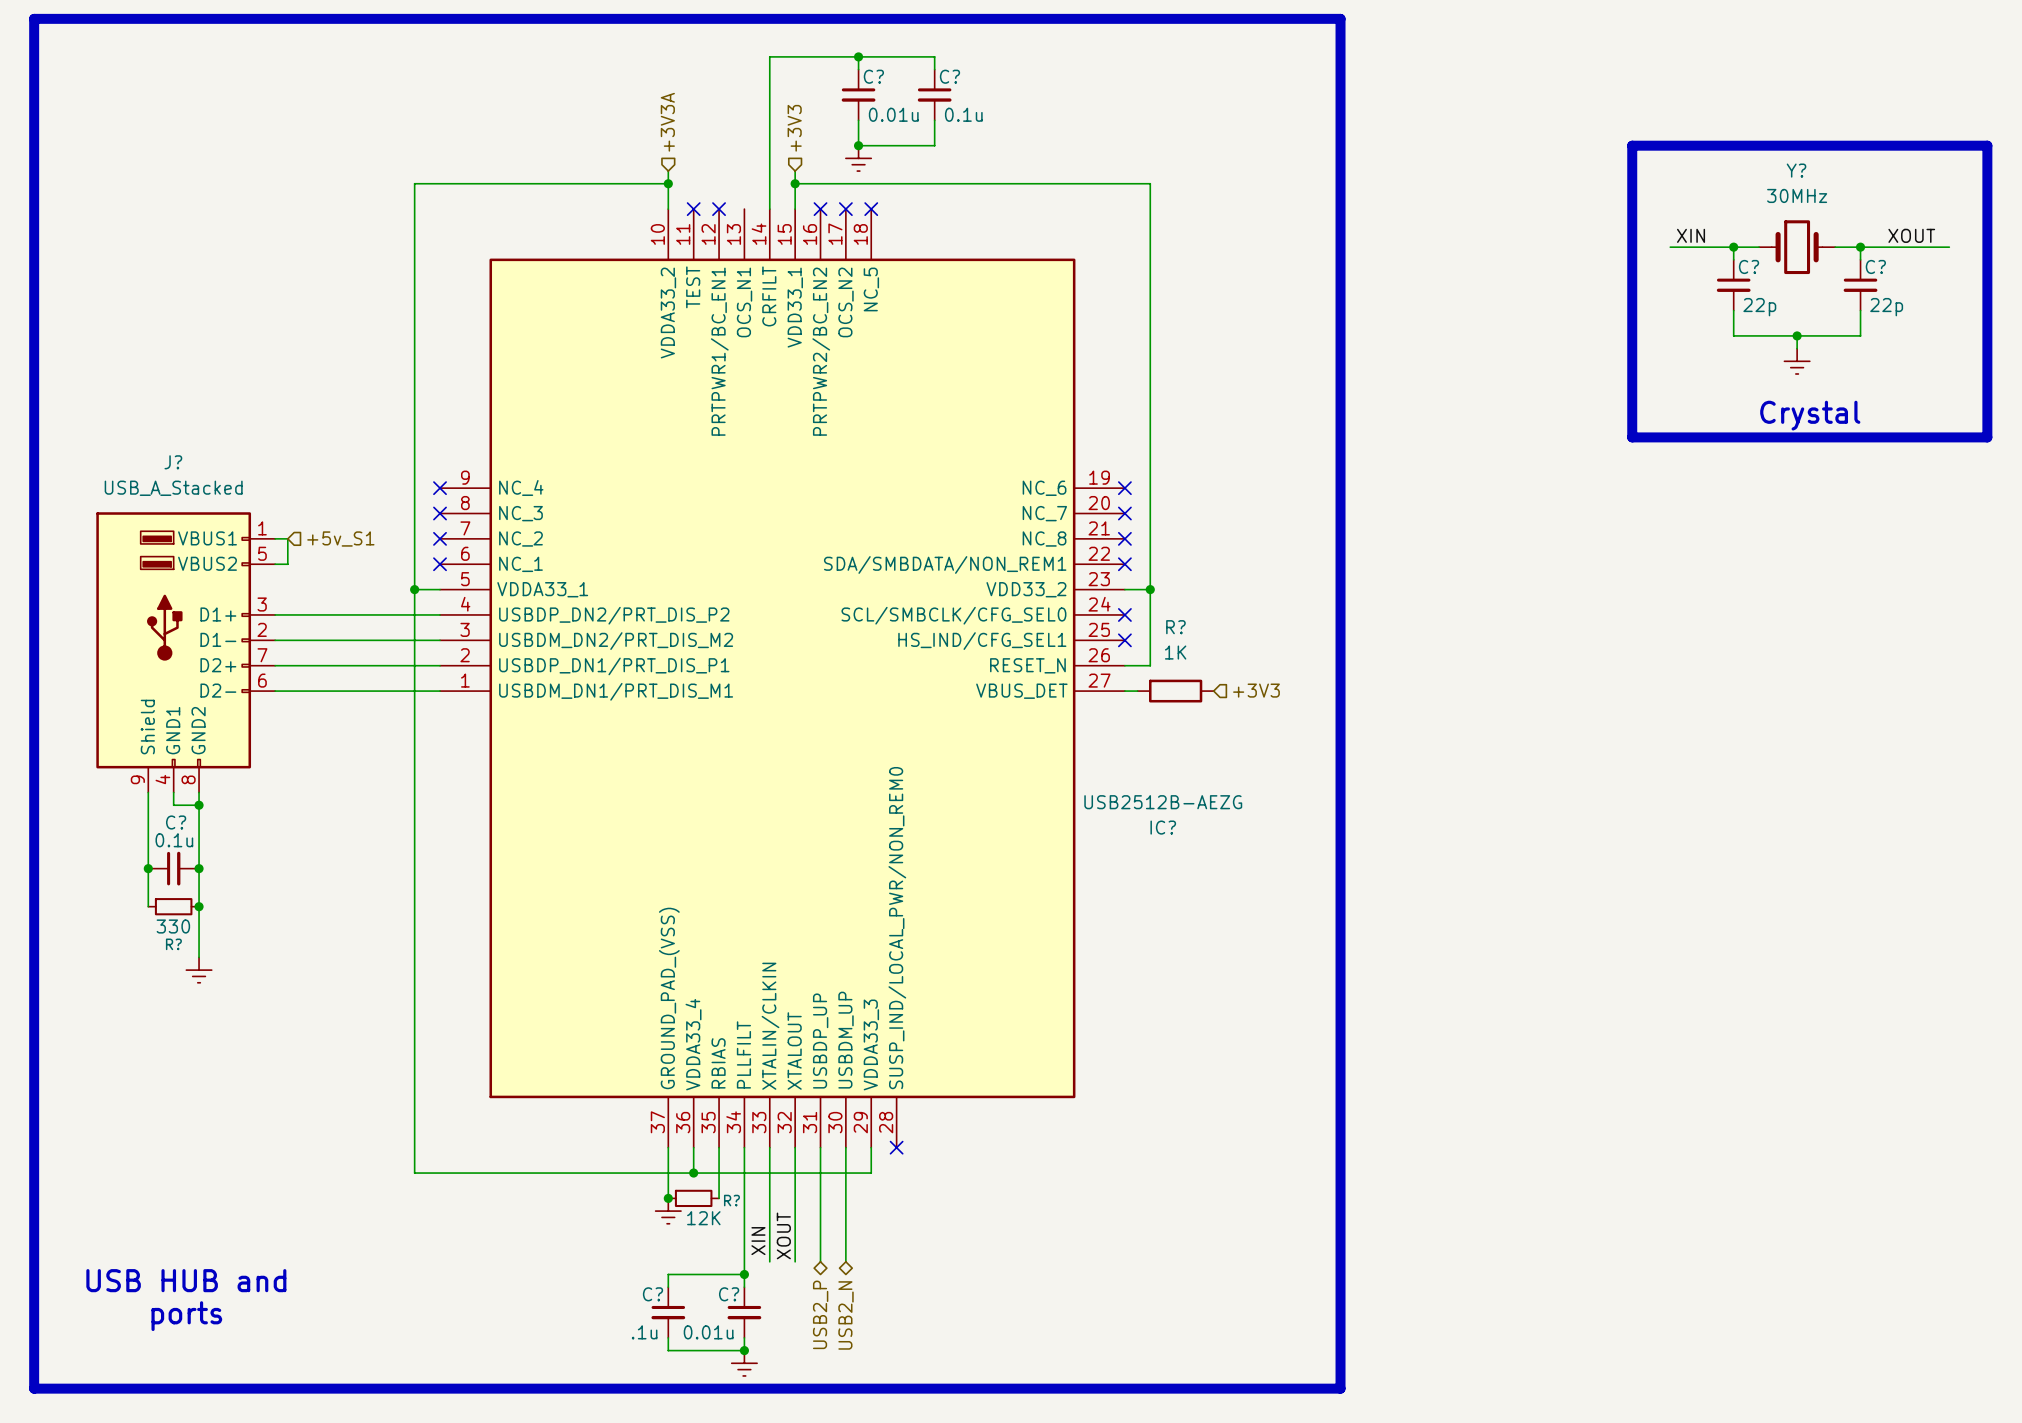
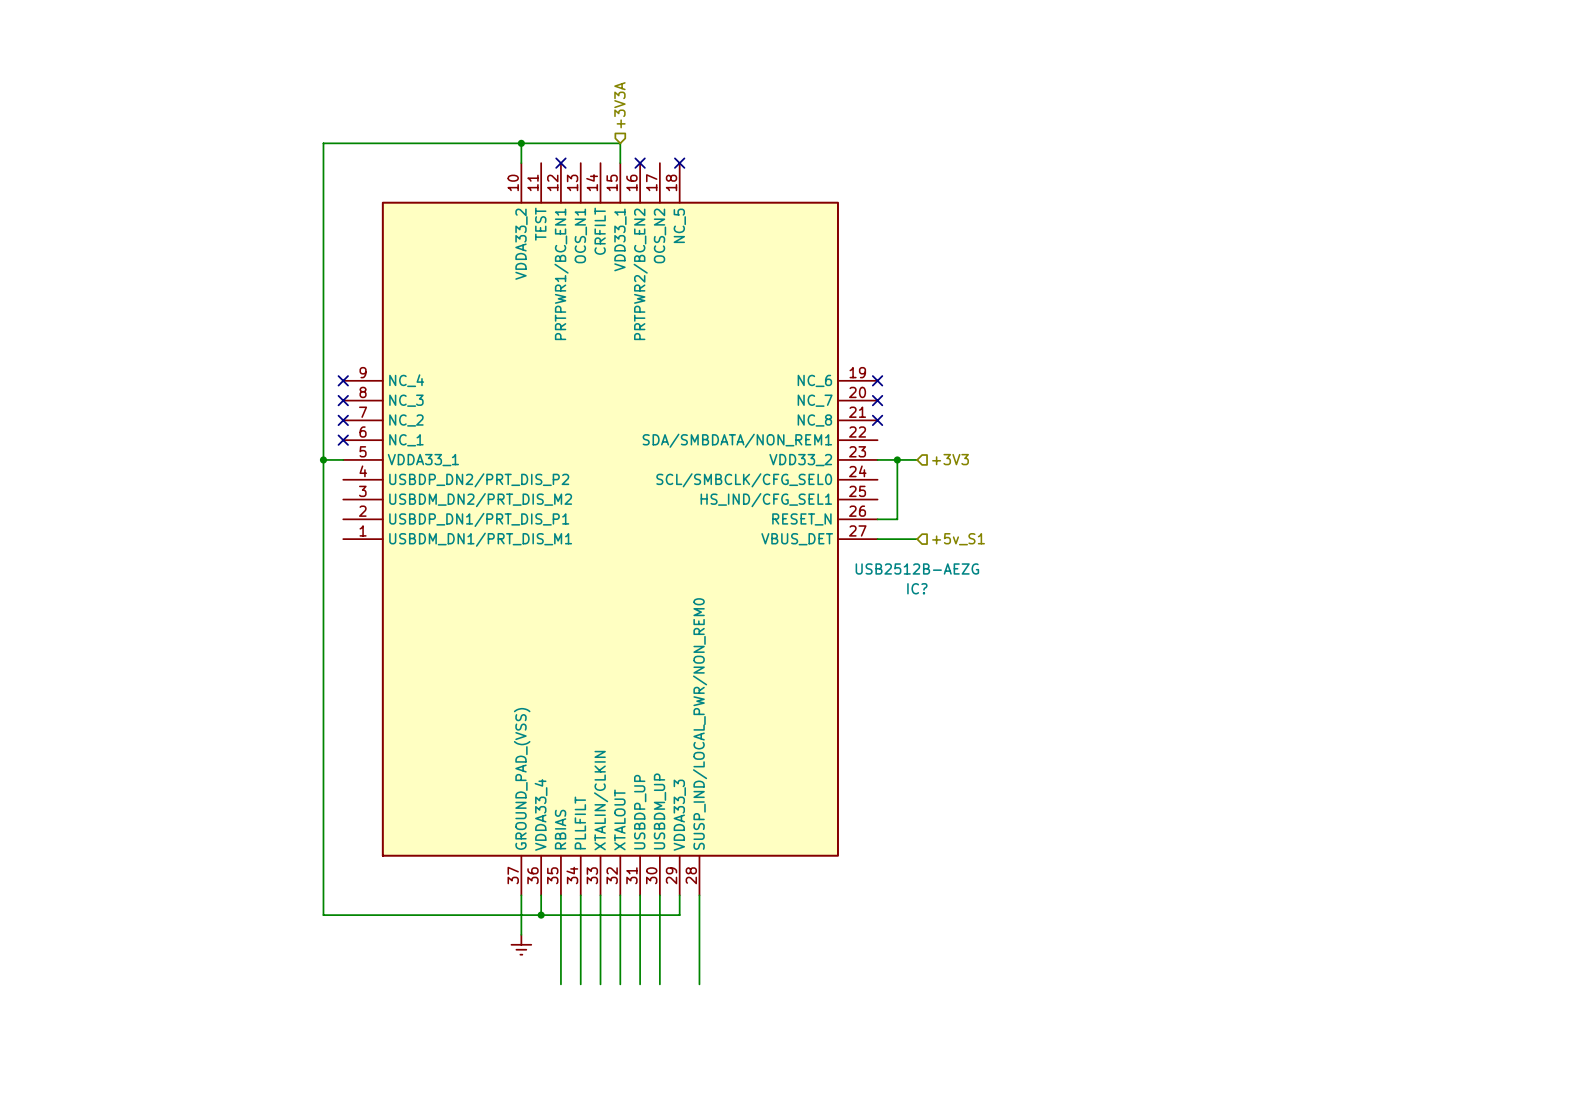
line: (34, 18) (1340, 18) (1340, 1388) (34, 1388) (34, 18) -> none
wire: (858, 56) (858, 69) -> none
junction: (858, 56) -> none
wire: (934, 69) (934, 56) (769, 56) (769, 209) -> none
C?: 0.01u (858, 94) -> none
C?: 0.1u (934, 94) -> none
wire: (858, 120) (858, 145) (934, 145) (934, 120) -> none
hierarchical label position: +3V3A (667, 122) -> +3V3A (619, 105)
hierarchical label: +3V3 (794, 128) -> none
junction: (858, 145) -> none
line: (1632, 145) (1987, 145) (1987, 437) (1632, 437) (1632, 145) -> none
power symbol: (858, 158) -> none
wire: (668, 171) (668, 183) -> (620, 143) (521, 143)
wire: (795, 171) (795, 183) (1150, 183) (1150, 589) -> (917, 459) (897, 459)
junction: (795, 183) -> none
no-connect mark: (693, 209) -> none
no-connect mark: (845, 209) -> none
label: XIN (1691, 235) -> none
label: XOUT (1911, 235) -> none
wire: (1670, 247) (1759, 247) -> none
wire: (1733, 247) (1733, 259) -> none
junction: (1733, 247) -> none
Y?: 30MHz (1797, 247) -> none
wire: (1835, 247) (1949, 247) -> none
wire: (1860, 247) (1860, 259) -> none
junction: (1860, 247) -> none
C?: 22p (1733, 285) -> none
C?: 22p (1860, 285) -> none
wire: (1733, 310) (1733, 335) (1860, 335) (1860, 310) -> none
wire: (1797, 335) (1797, 348) -> none
junction: (1797, 335) -> none
power symbol: (1797, 361) -> none
text: Crystal (1810, 415) -> none
wire: (275, 538) (287, 538) (287, 564) (275, 564) -> none
hierarchical label: +5v_S1 (340, 539) -> none
no-connect mark: (1124, 564) -> none
wire: (275, 614) (440, 614) -> none
no-connect mark: (1124, 614) -> none
wire: (275, 640) (440, 640) -> none
no-connect mark: (1124, 640) -> none
J?: USB_A_Stacked (185, 652) -> none
wire: (275, 665) (440, 665) -> none
hierarchical label position: +3V3 (1256, 690) -> +3V3 (950, 459)
wire: (275, 691) (440, 691) -> none
wire: none -> (887, 539) (917, 539)
R?: 1K (1175, 691) -> none
hierarchical label: none -> +5v_S1 (958, 539)
wire: (148, 792) (148, 906) -> none
wire: (173, 792) (173, 805) (199, 805) -> none
wire: (199, 792) (199, 957) -> none
IC? value position: USB2512B-AEZG (1163, 802) -> USB2512B-AEZG (917, 568)
junction: (199, 805) -> none
IC? name position: IC? (1163, 827) -> IC? (917, 588)
junction: (148, 868) -> none
C?: 0.1u (173, 868) -> none
junction: (199, 868) -> none
R?: 330 (173, 906) -> none
junction: (199, 906) -> none
power symbol: (199, 970) -> none
wire: none -> (699, 895) (699, 984)
no-connect mark: (896, 1147) -> none
junction: (668, 1198) -> none
R?: 12K (693, 1198) -> none
wire: none -> (560, 934) (560, 984)
label: XOUT (783, 1235) -> none
label: XIN (758, 1241) -> none
wire: (744, 1261) (744, 1287) -> none
wire: (744, 1274) (668, 1274) (668, 1287) -> none
junction: (744, 1274) -> none
text: USB HUB and (186, 1280) -> none
C?: .1u (668, 1312) -> none
C?: 0.01u (744, 1312) -> none
hierarchical label: USB2_P (820, 1314) -> none
hierarchical label: USB2_N (846, 1315) -> none
text: ports (186, 1316) -> none
wire: (668, 1337) (668, 1350) (744, 1350) (744, 1337) -> none
junction: (744, 1350) -> none
power symbol: (744, 1363) -> none

